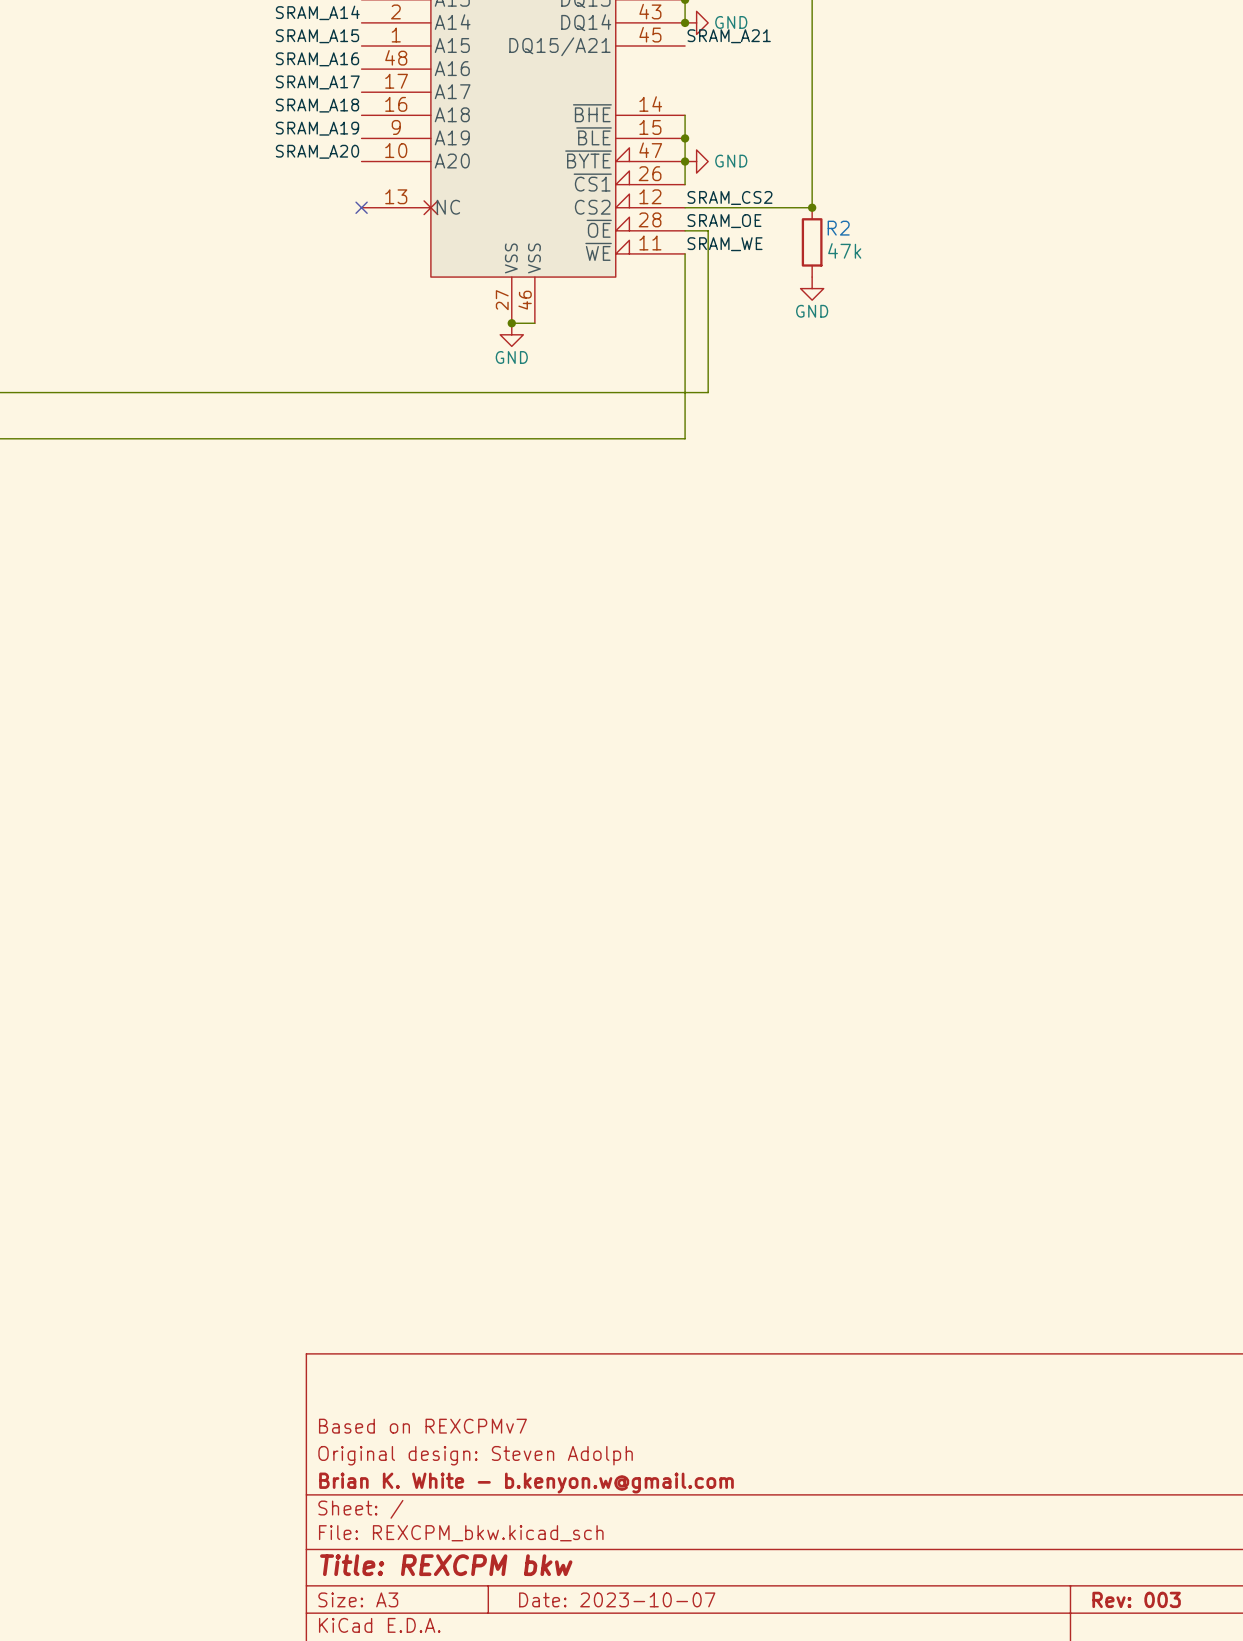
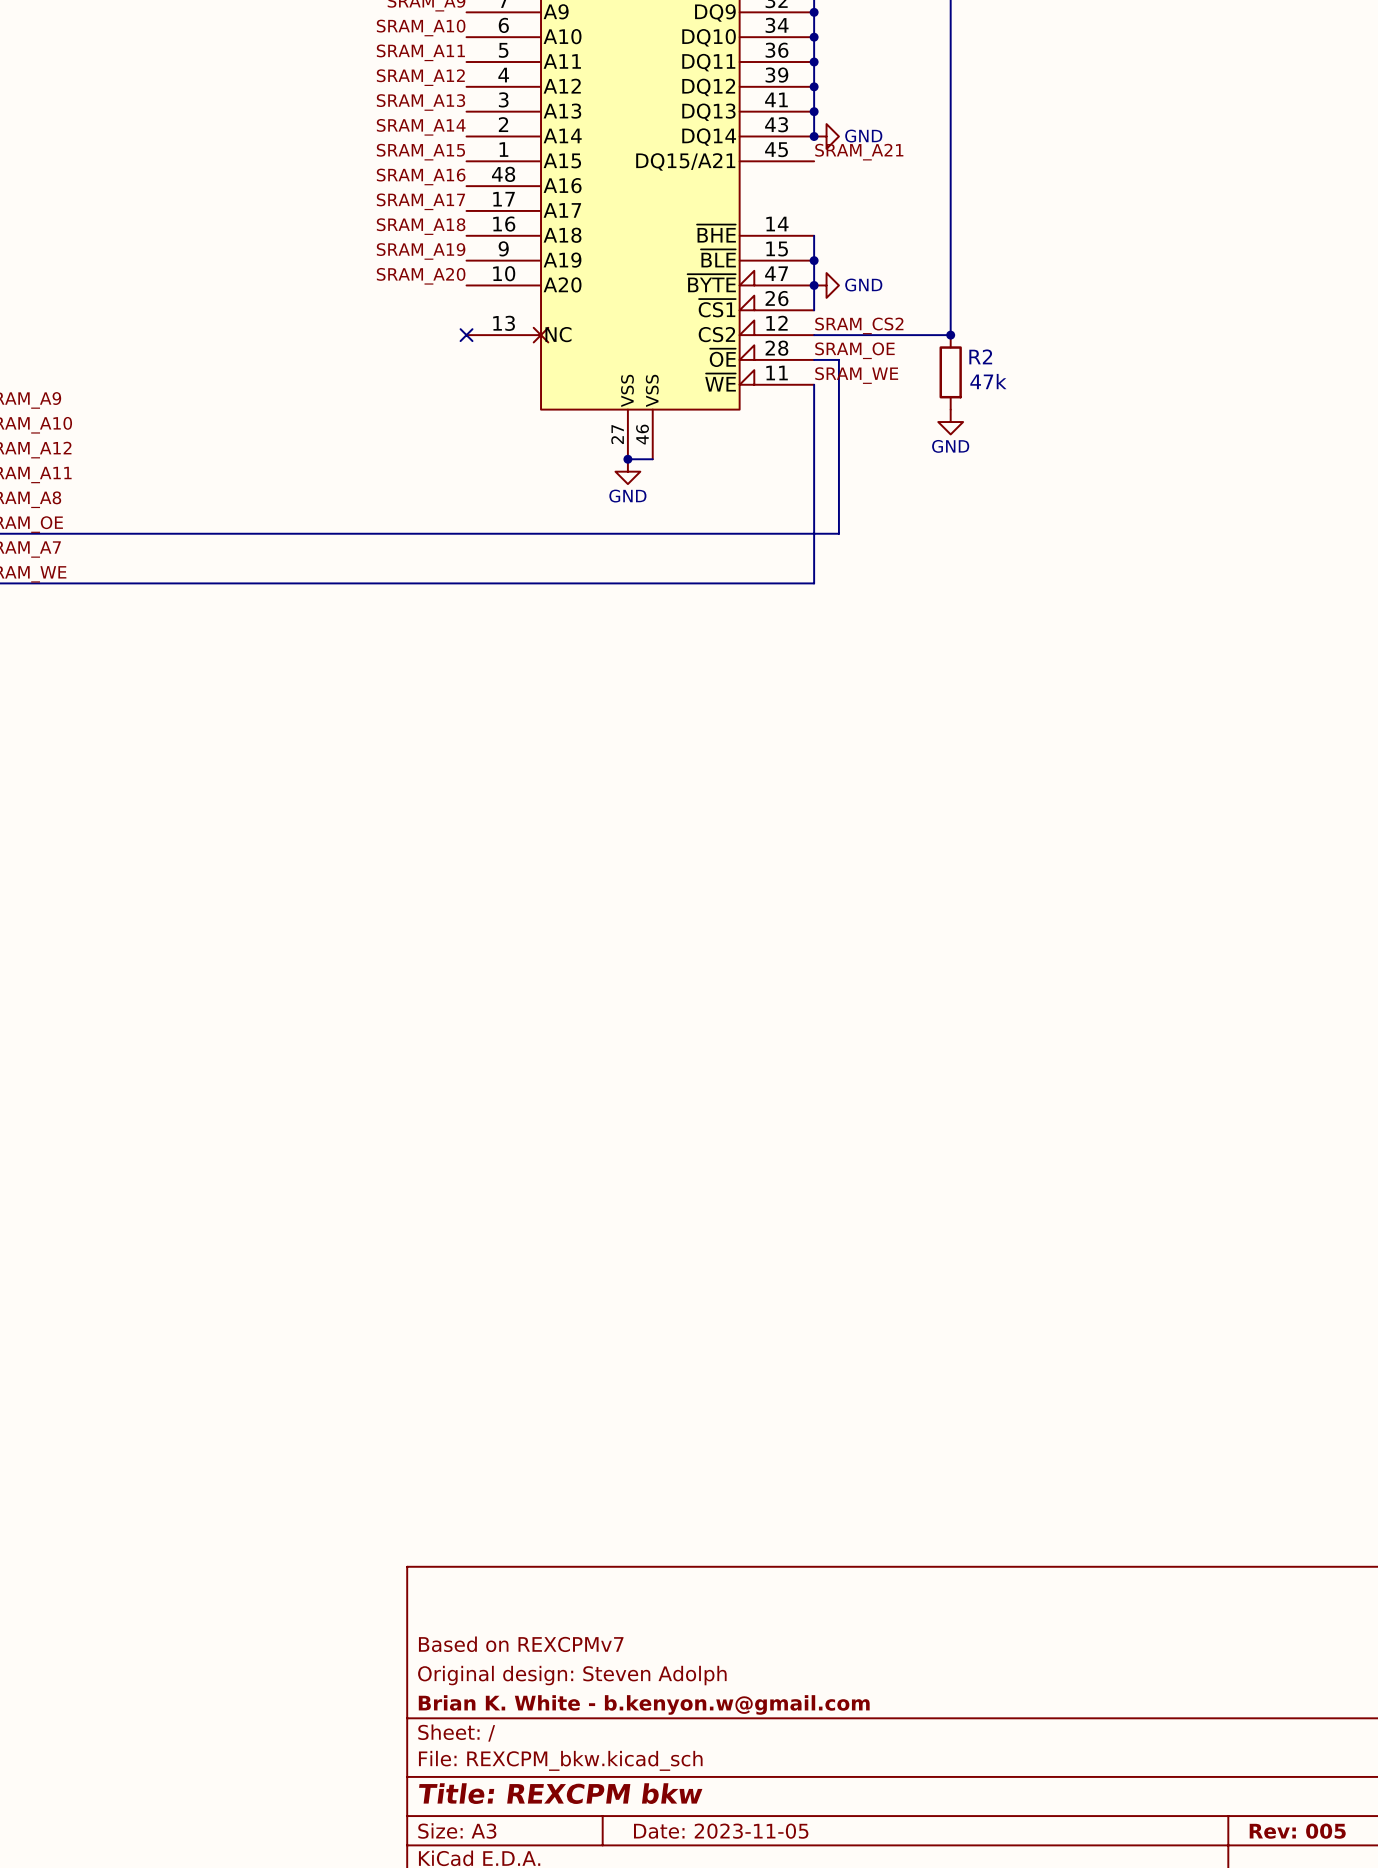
title block: Date: 2023-10-07 (617, 1599) -> Date: 2023-11-05 (721, 1831)
title block: Rev: 003 (1136, 1599) -> Rev: 005 (1297, 1831)

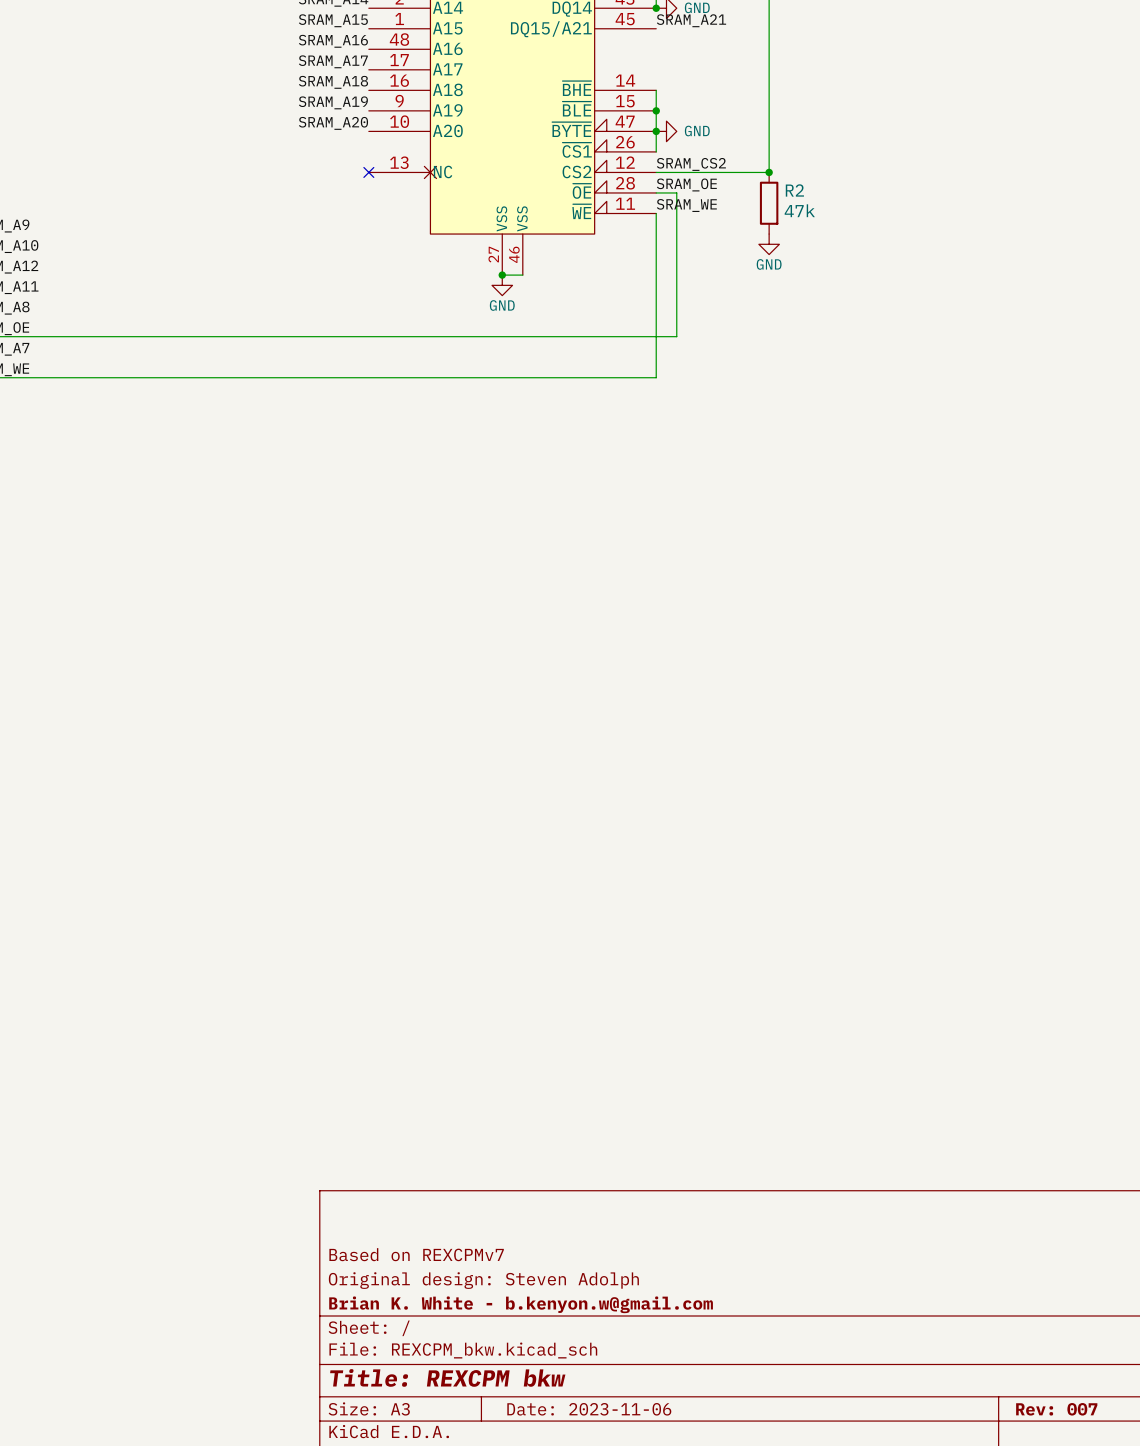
title block: Date: 2023-11-05 (721, 1831) -> Date: 2023-11-06 (589, 1409)
title block: Rev: 005 (1297, 1831) -> Rev: 007 (1056, 1409)

